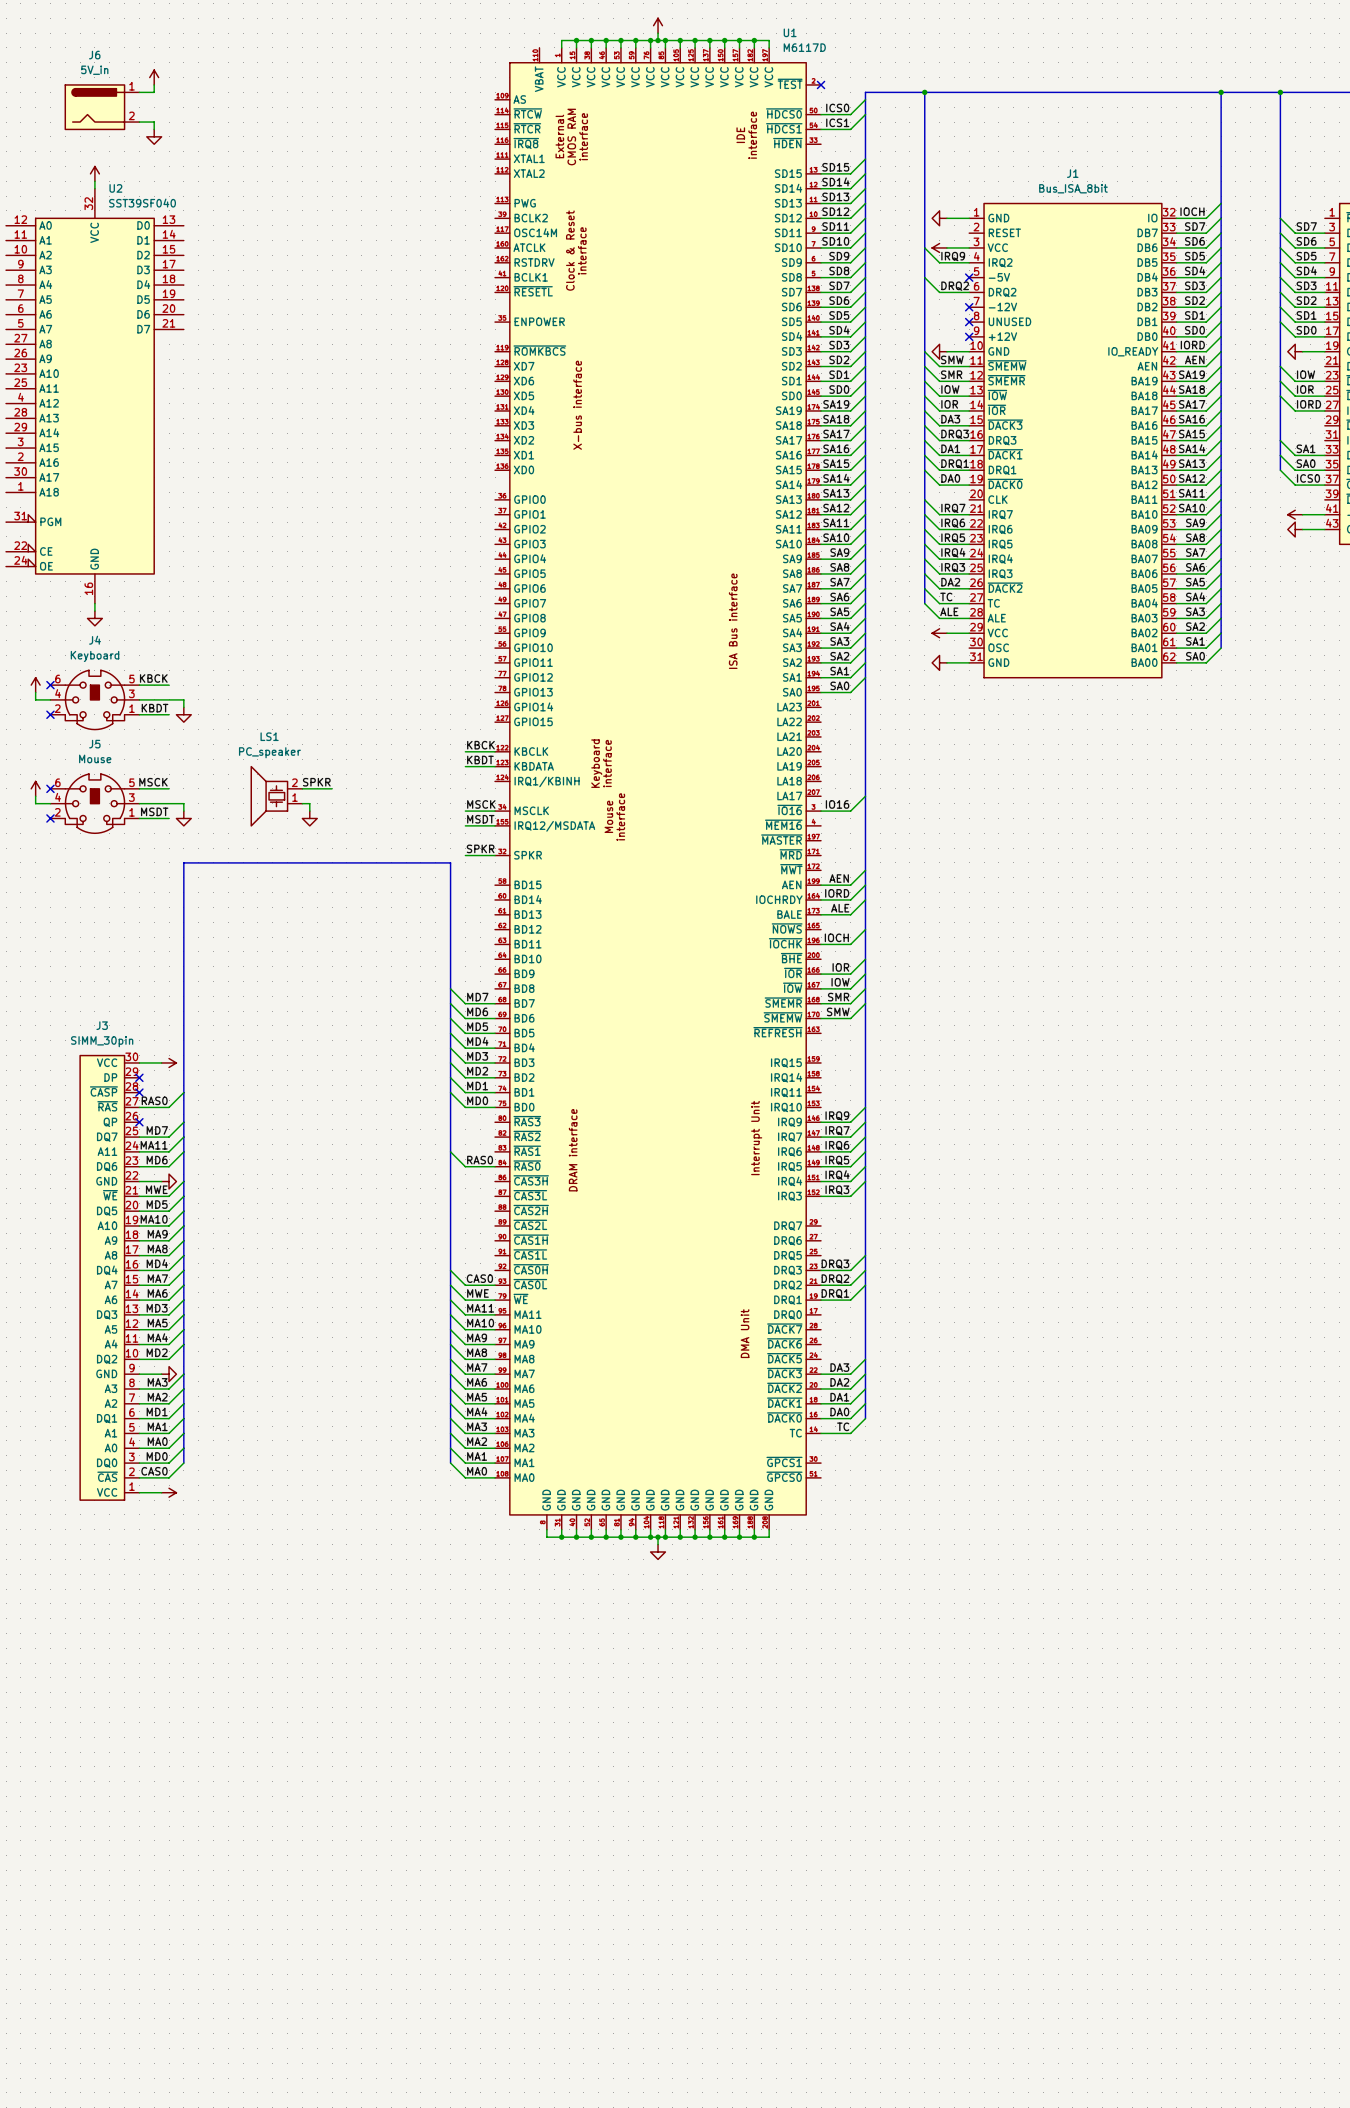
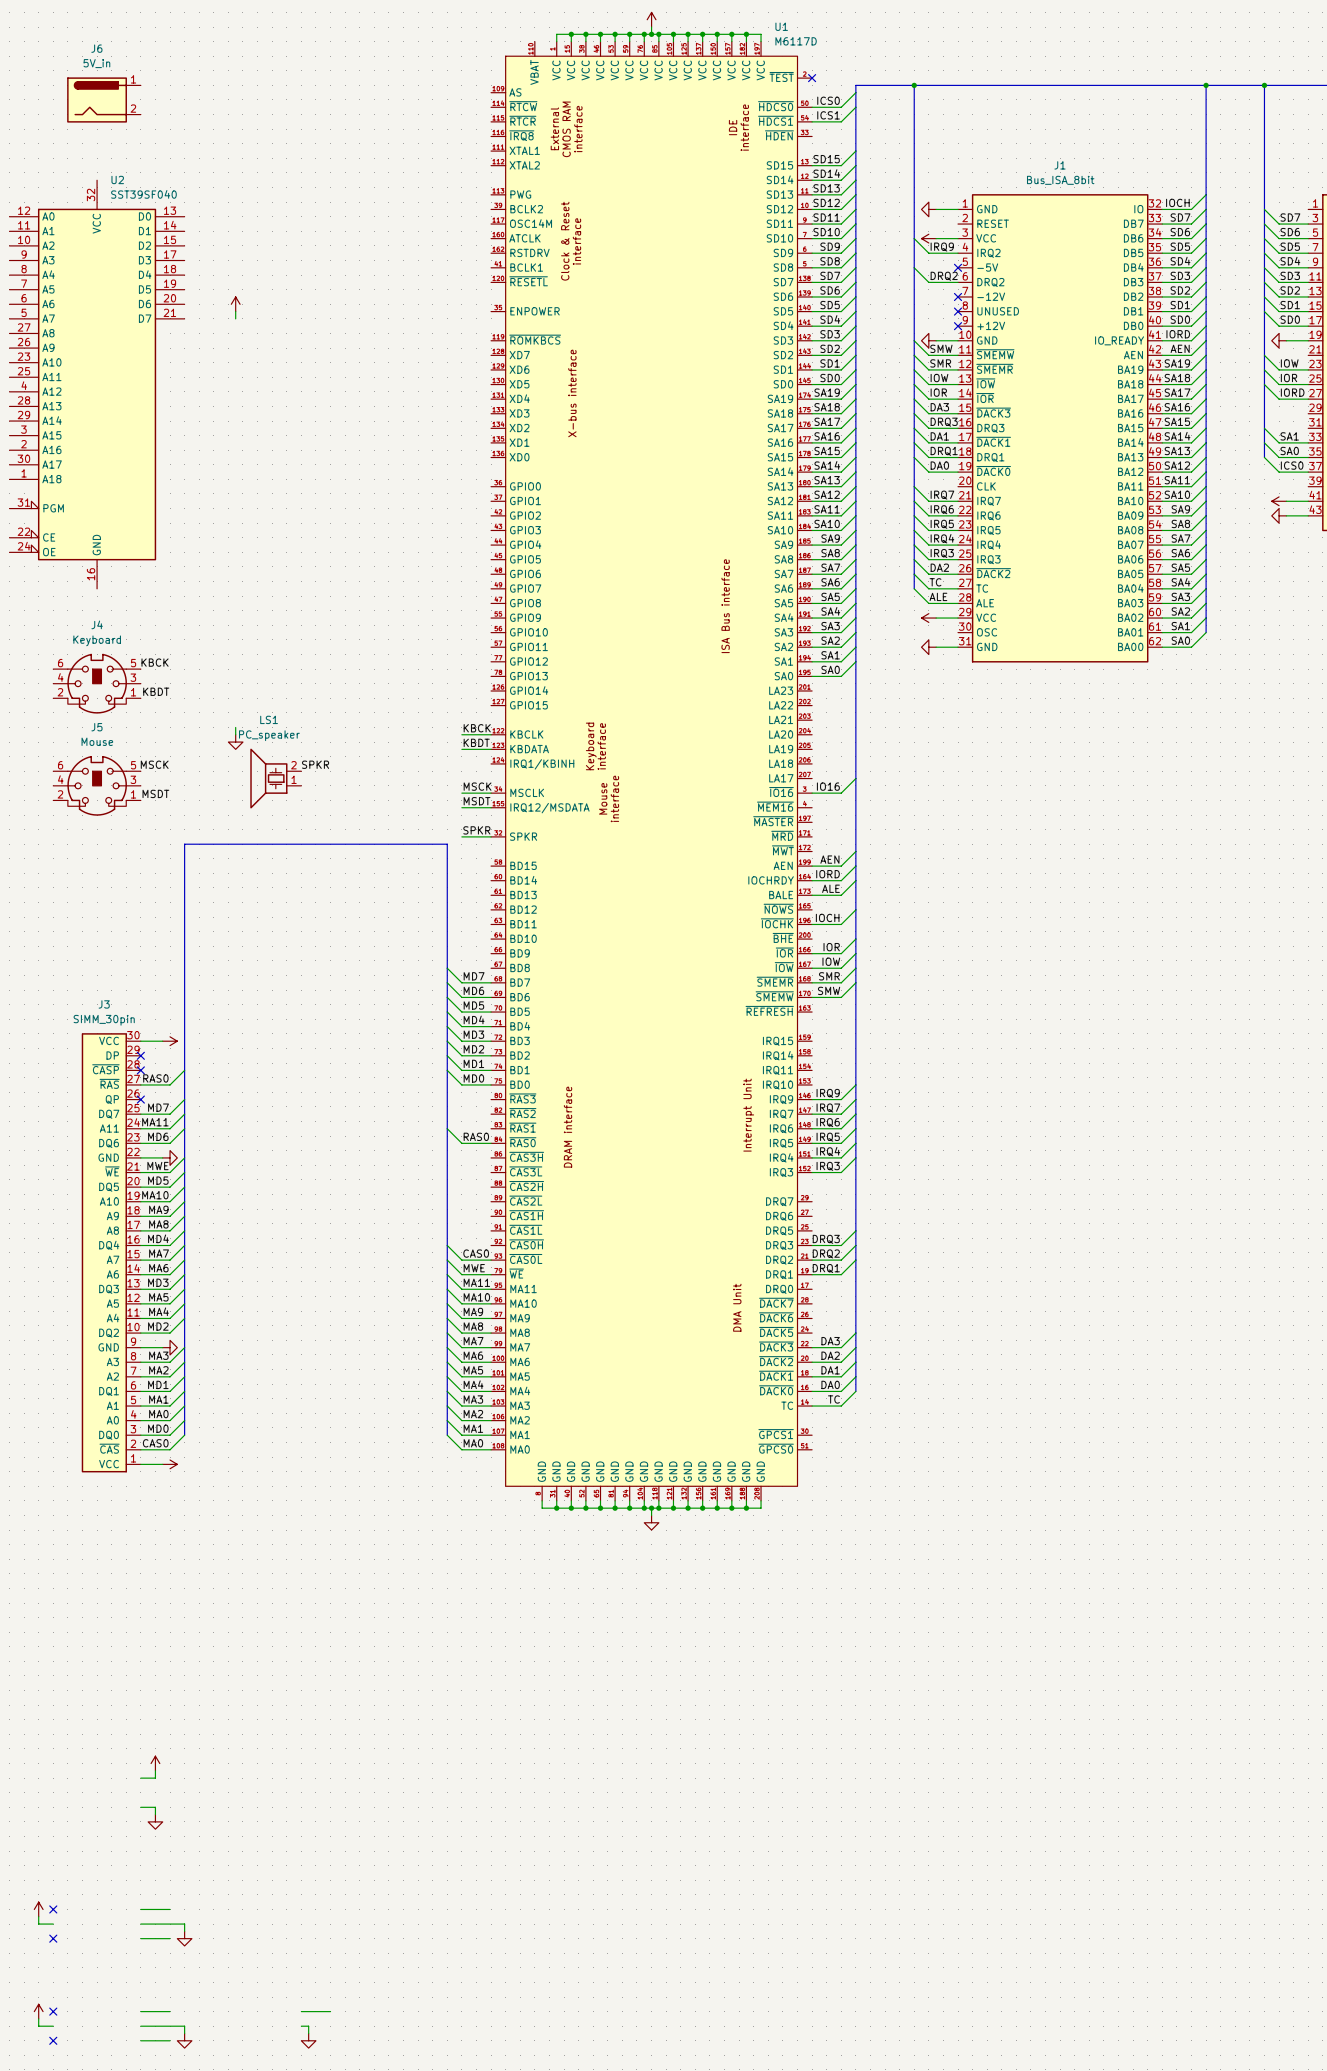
power symbol: (154, 77) -> none
wire: (154, 84) (154, 92) (139, 92) -> none
wire: (139, 122) (154, 122) (154, 129) -> none
power symbol: (154, 136) -> none
power symbol: (94, 173) -> none
wire: (94, 181) (94, 188) -> none
power symbol: none -> (235, 304)
wire: none -> (235, 311) (235, 318)
wire: (94, 603) (94, 611) -> none
power symbol: (94, 618) -> none
power symbol: (35, 685) -> none
no-connect mark: (50, 685) -> none
wire: (139, 685) (169, 685) -> none
wire: (35, 692) (35, 699) (50, 699) -> none
wire: (139, 699) (183, 699) (183, 707) -> none
no-connect mark: (50, 714) -> none
wire: (139, 714) (169, 714) -> none
power symbol: (183, 714) -> none
wire: none -> (235, 727) (235, 734)
power symbol: none -> (235, 742)
power symbol: (35, 788) -> none
no-connect mark: (50, 788) -> none
wire: (139, 788) (169, 788) -> none
wire: (302, 788) (332, 788) -> none
wire: (35, 796) (35, 803) (50, 803) -> none
wire: (139, 803) (183, 803) (183, 811) -> none
wire: (302, 803) (309, 803) (309, 811) -> none
no-connect mark: (50, 818) -> none
wire: (139, 818) (169, 818) -> none
power symbol: (183, 818) -> none
power symbol: (309, 818) -> none
power symbol: none -> (155, 1763)
wire: none -> (155, 1770) (155, 1778) (140, 1778)
wire: none -> (140, 1807) (155, 1807) (155, 1814)
power symbol: none -> (155, 1821)
power symbol: none -> (38, 1909)
no-connect mark: none -> (53, 1909)
wire: none -> (140, 1909) (170, 1909)
wire: none -> (38, 1916) (38, 1924) (53, 1924)
wire: none -> (140, 1924) (184, 1924) (184, 1931)
no-connect mark: none -> (53, 1938)
wire: none -> (140, 1938) (170, 1938)
power symbol: none -> (184, 1938)
power symbol: none -> (38, 2011)
no-connect mark: none -> (53, 2011)
wire: none -> (140, 2011) (170, 2011)
wire: none -> (301, 2011) (330, 2011)
wire: none -> (38, 2018) (38, 2026) (53, 2026)
wire: none -> (140, 2026) (184, 2026) (184, 2033)
wire: none -> (301, 2026) (308, 2026) (308, 2033)
no-connect mark: none -> (53, 2040)
wire: none -> (140, 2040) (170, 2040)
power symbol: none -> (184, 2040)
power symbol: none -> (308, 2040)

